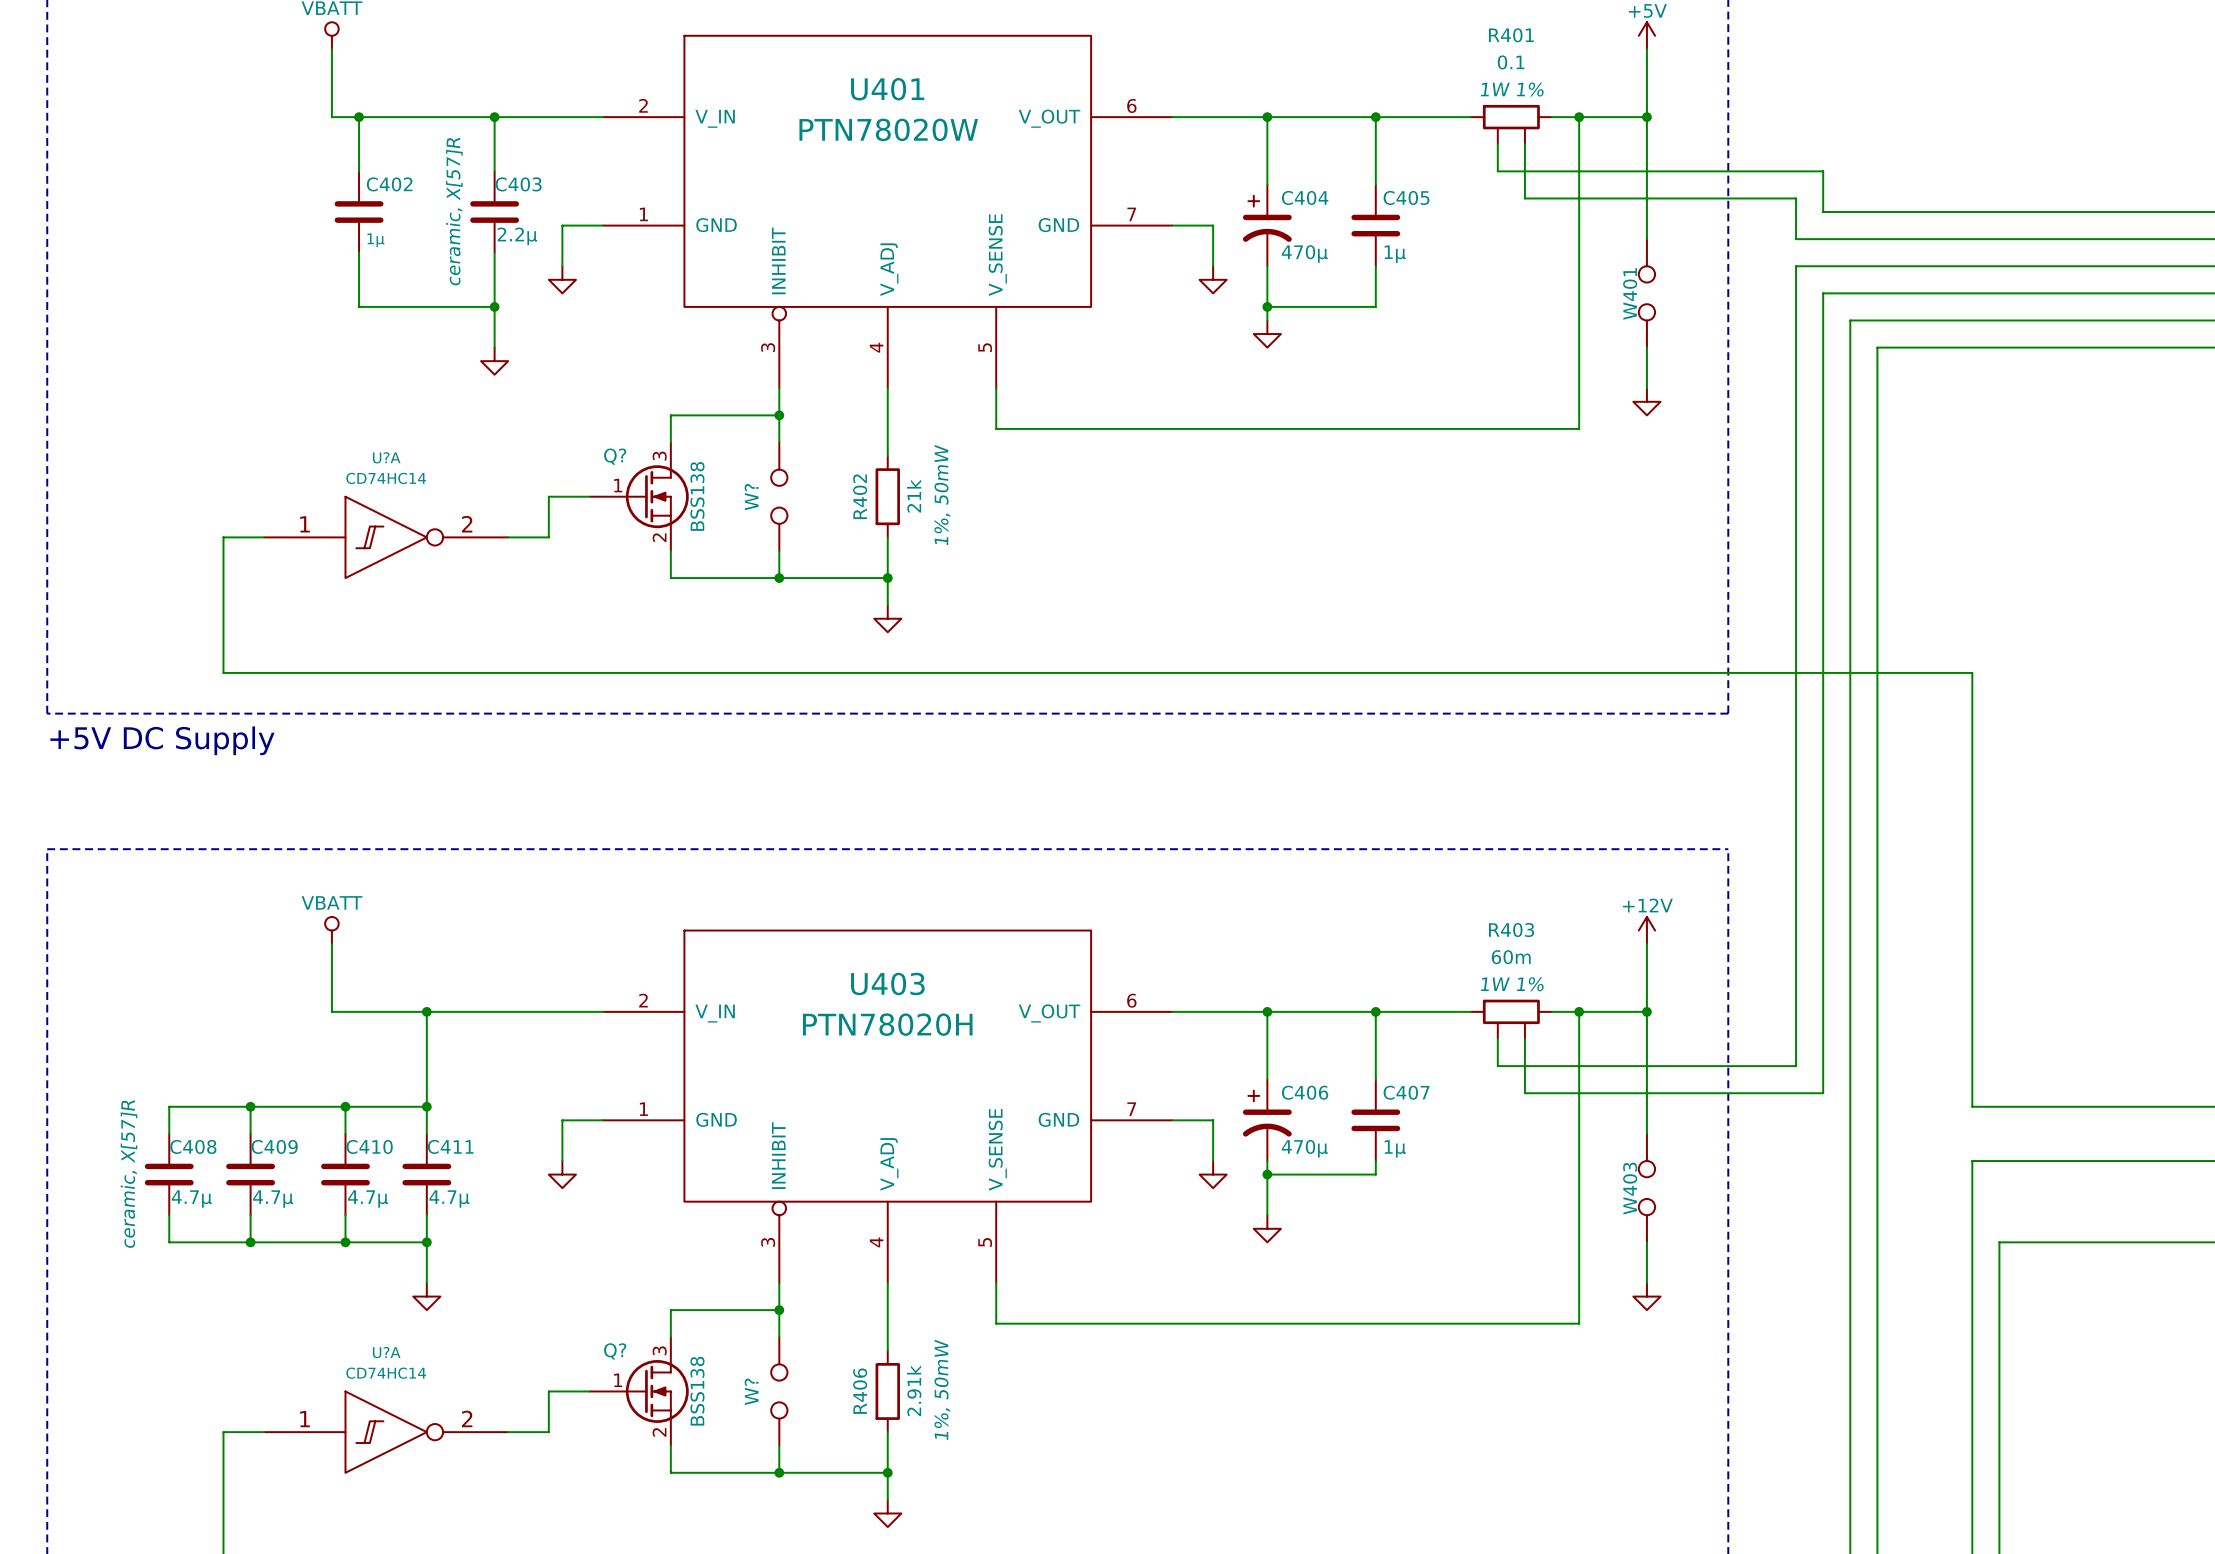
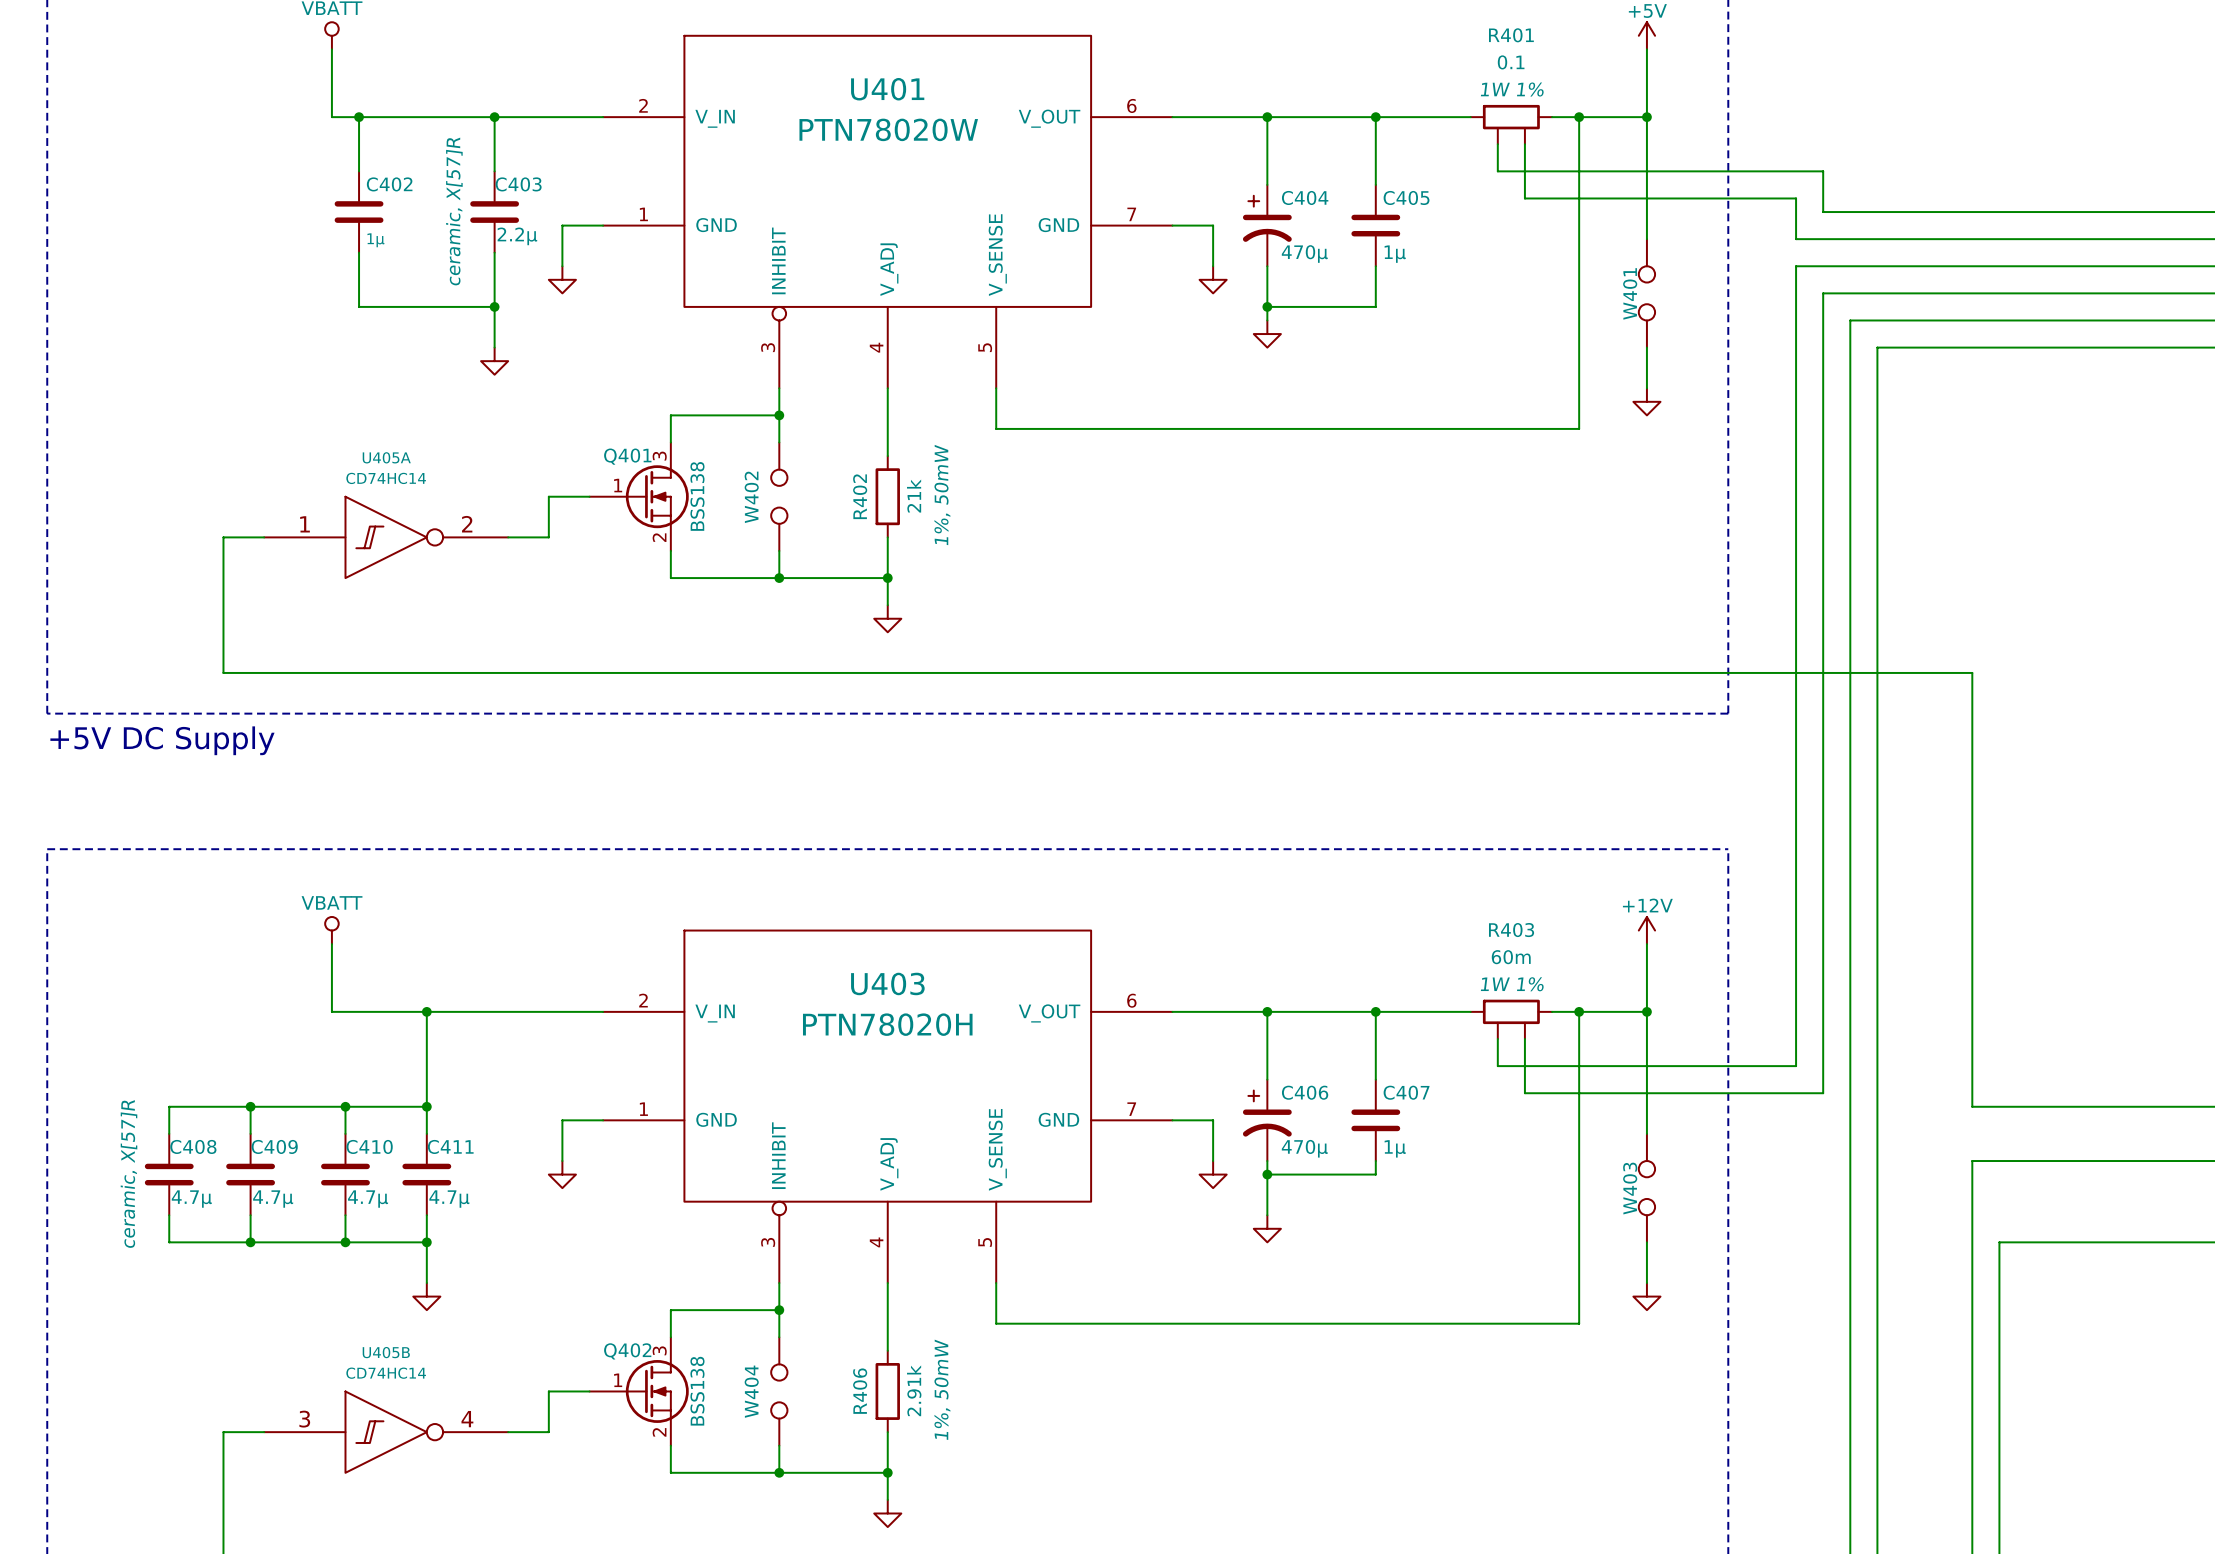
Q? name: Q? (615, 456) -> Q401 (627, 456)
U?A name: U?A (386, 457) -> U405A (386, 457)
W? name: W? (751, 497) -> W402 (751, 497)
Q? name: Q? (615, 1351) -> Q402 (627, 1351)
U?A name: U?A (386, 1352) -> U405B (386, 1352)
W? name: W? (751, 1391) -> W404 (751, 1391)
U?A pin number: 2 (467, 1418) -> 4 (467, 1419)
U?A pin number: 1 (305, 1419) -> 3 (304, 1419)

